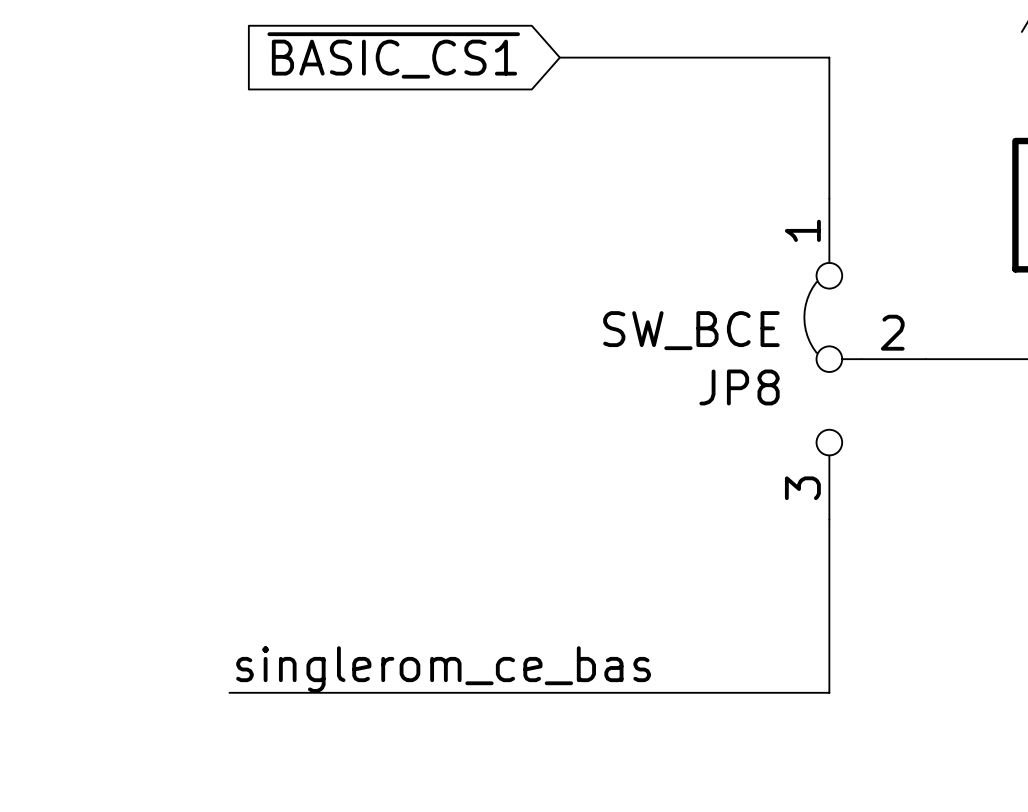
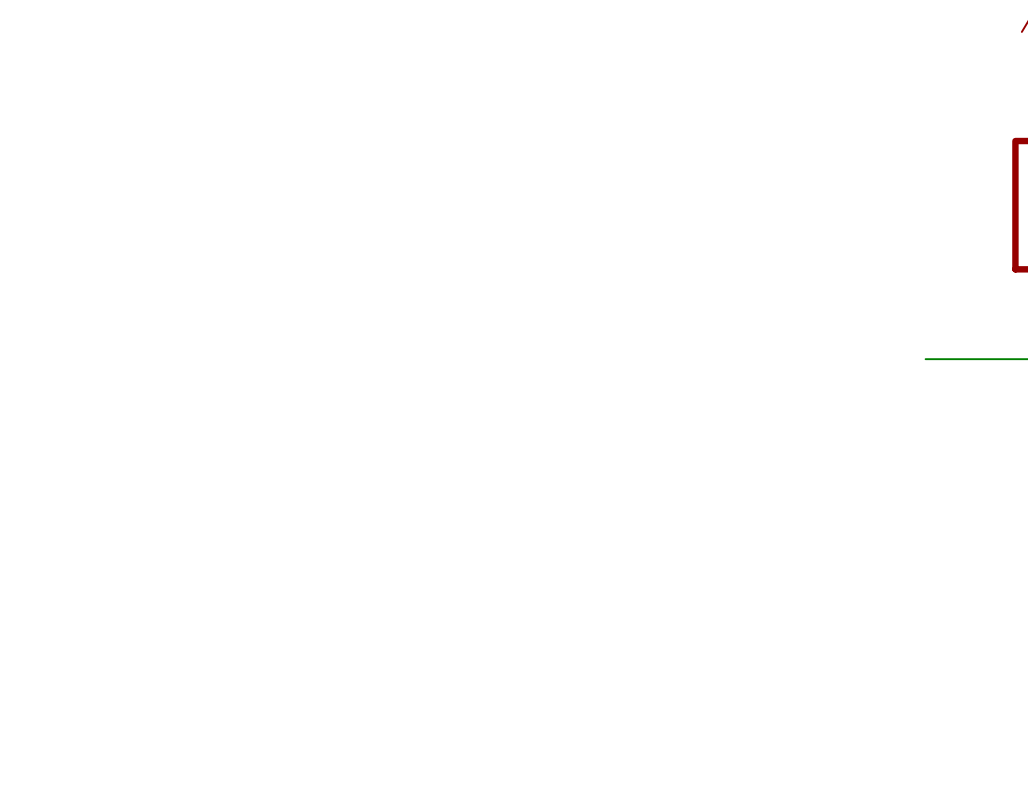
global label: ~{BASIC_CS1} (393, 55) -> none
wire: (559, 57) (829, 57) (829, 198) -> none
JP8: SW_BCE (864, 359) -> none
wire: (829, 519) (829, 692) (229, 692) -> none
label: singlerom_ce_bas (443, 669) -> none

